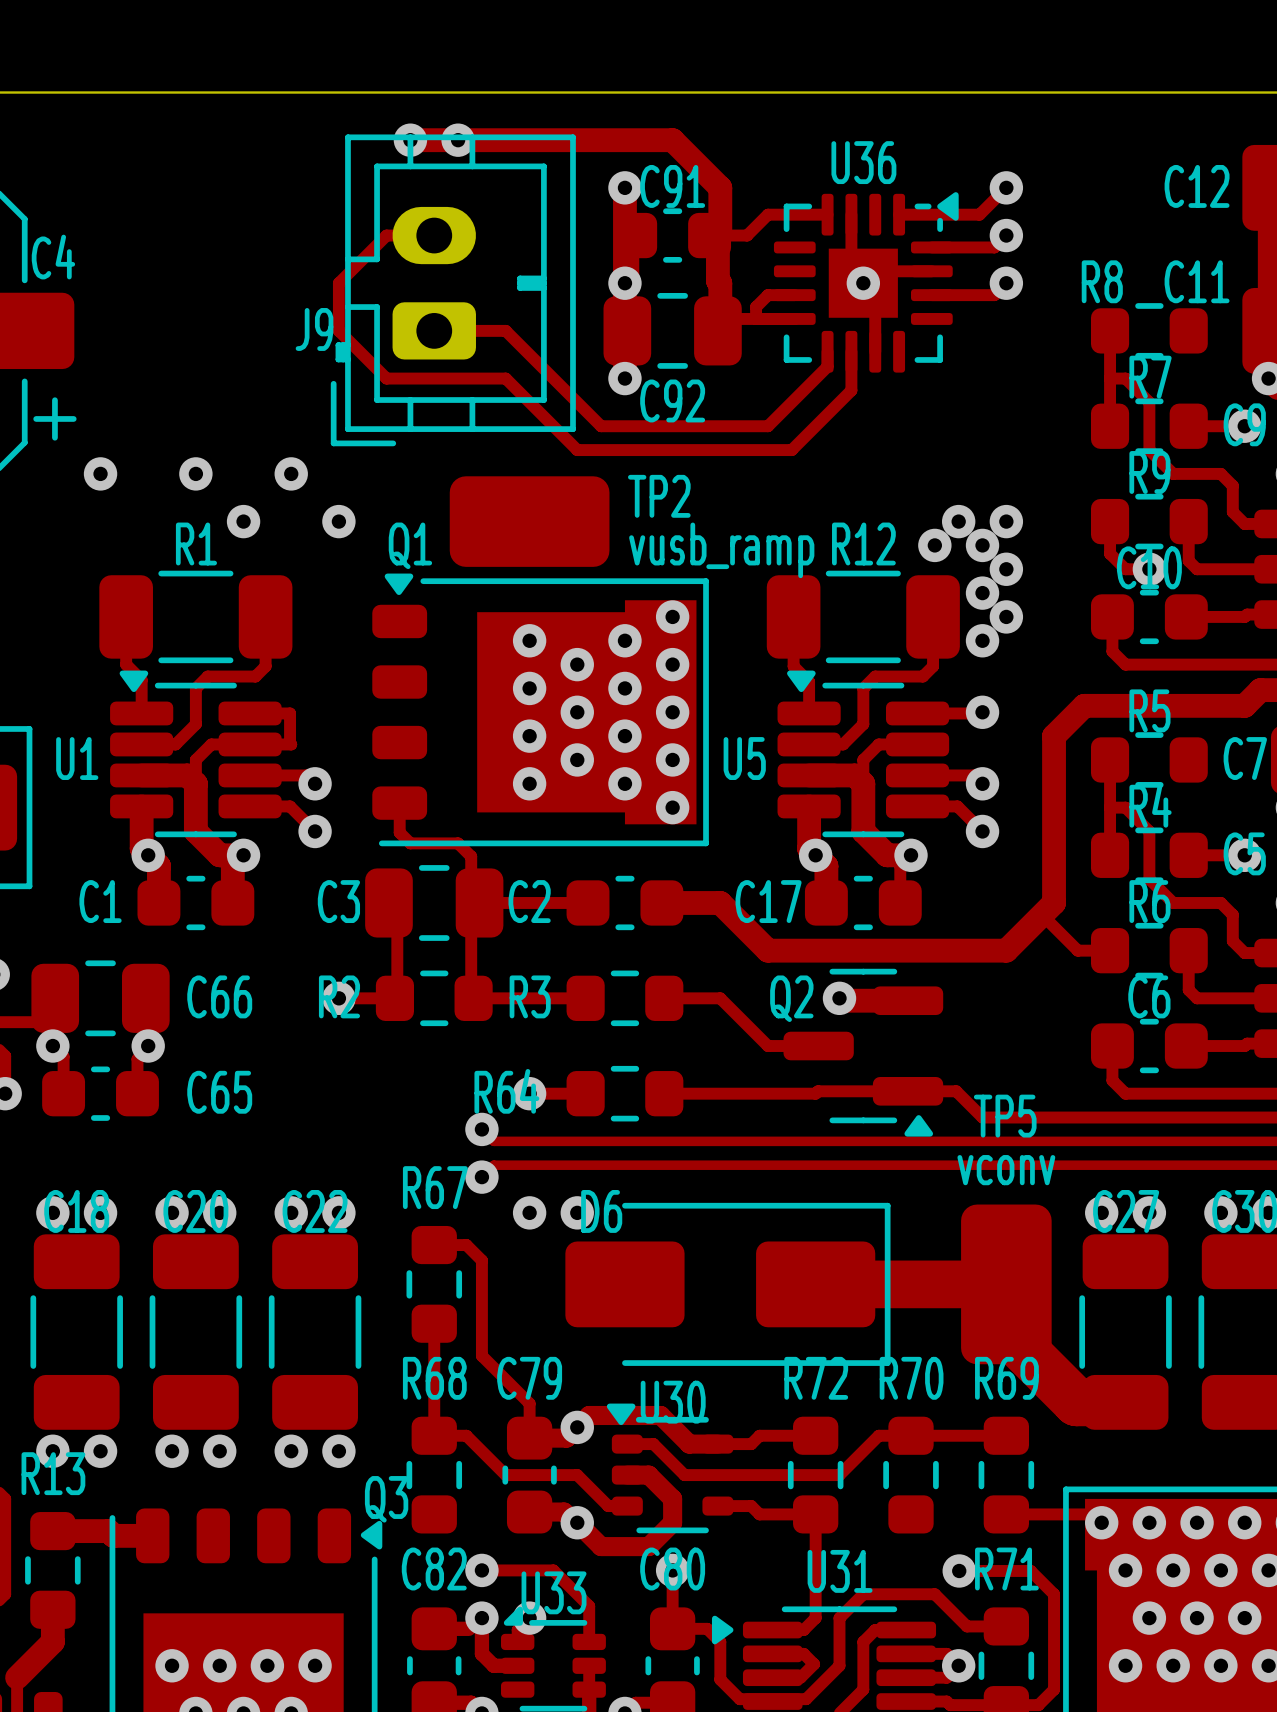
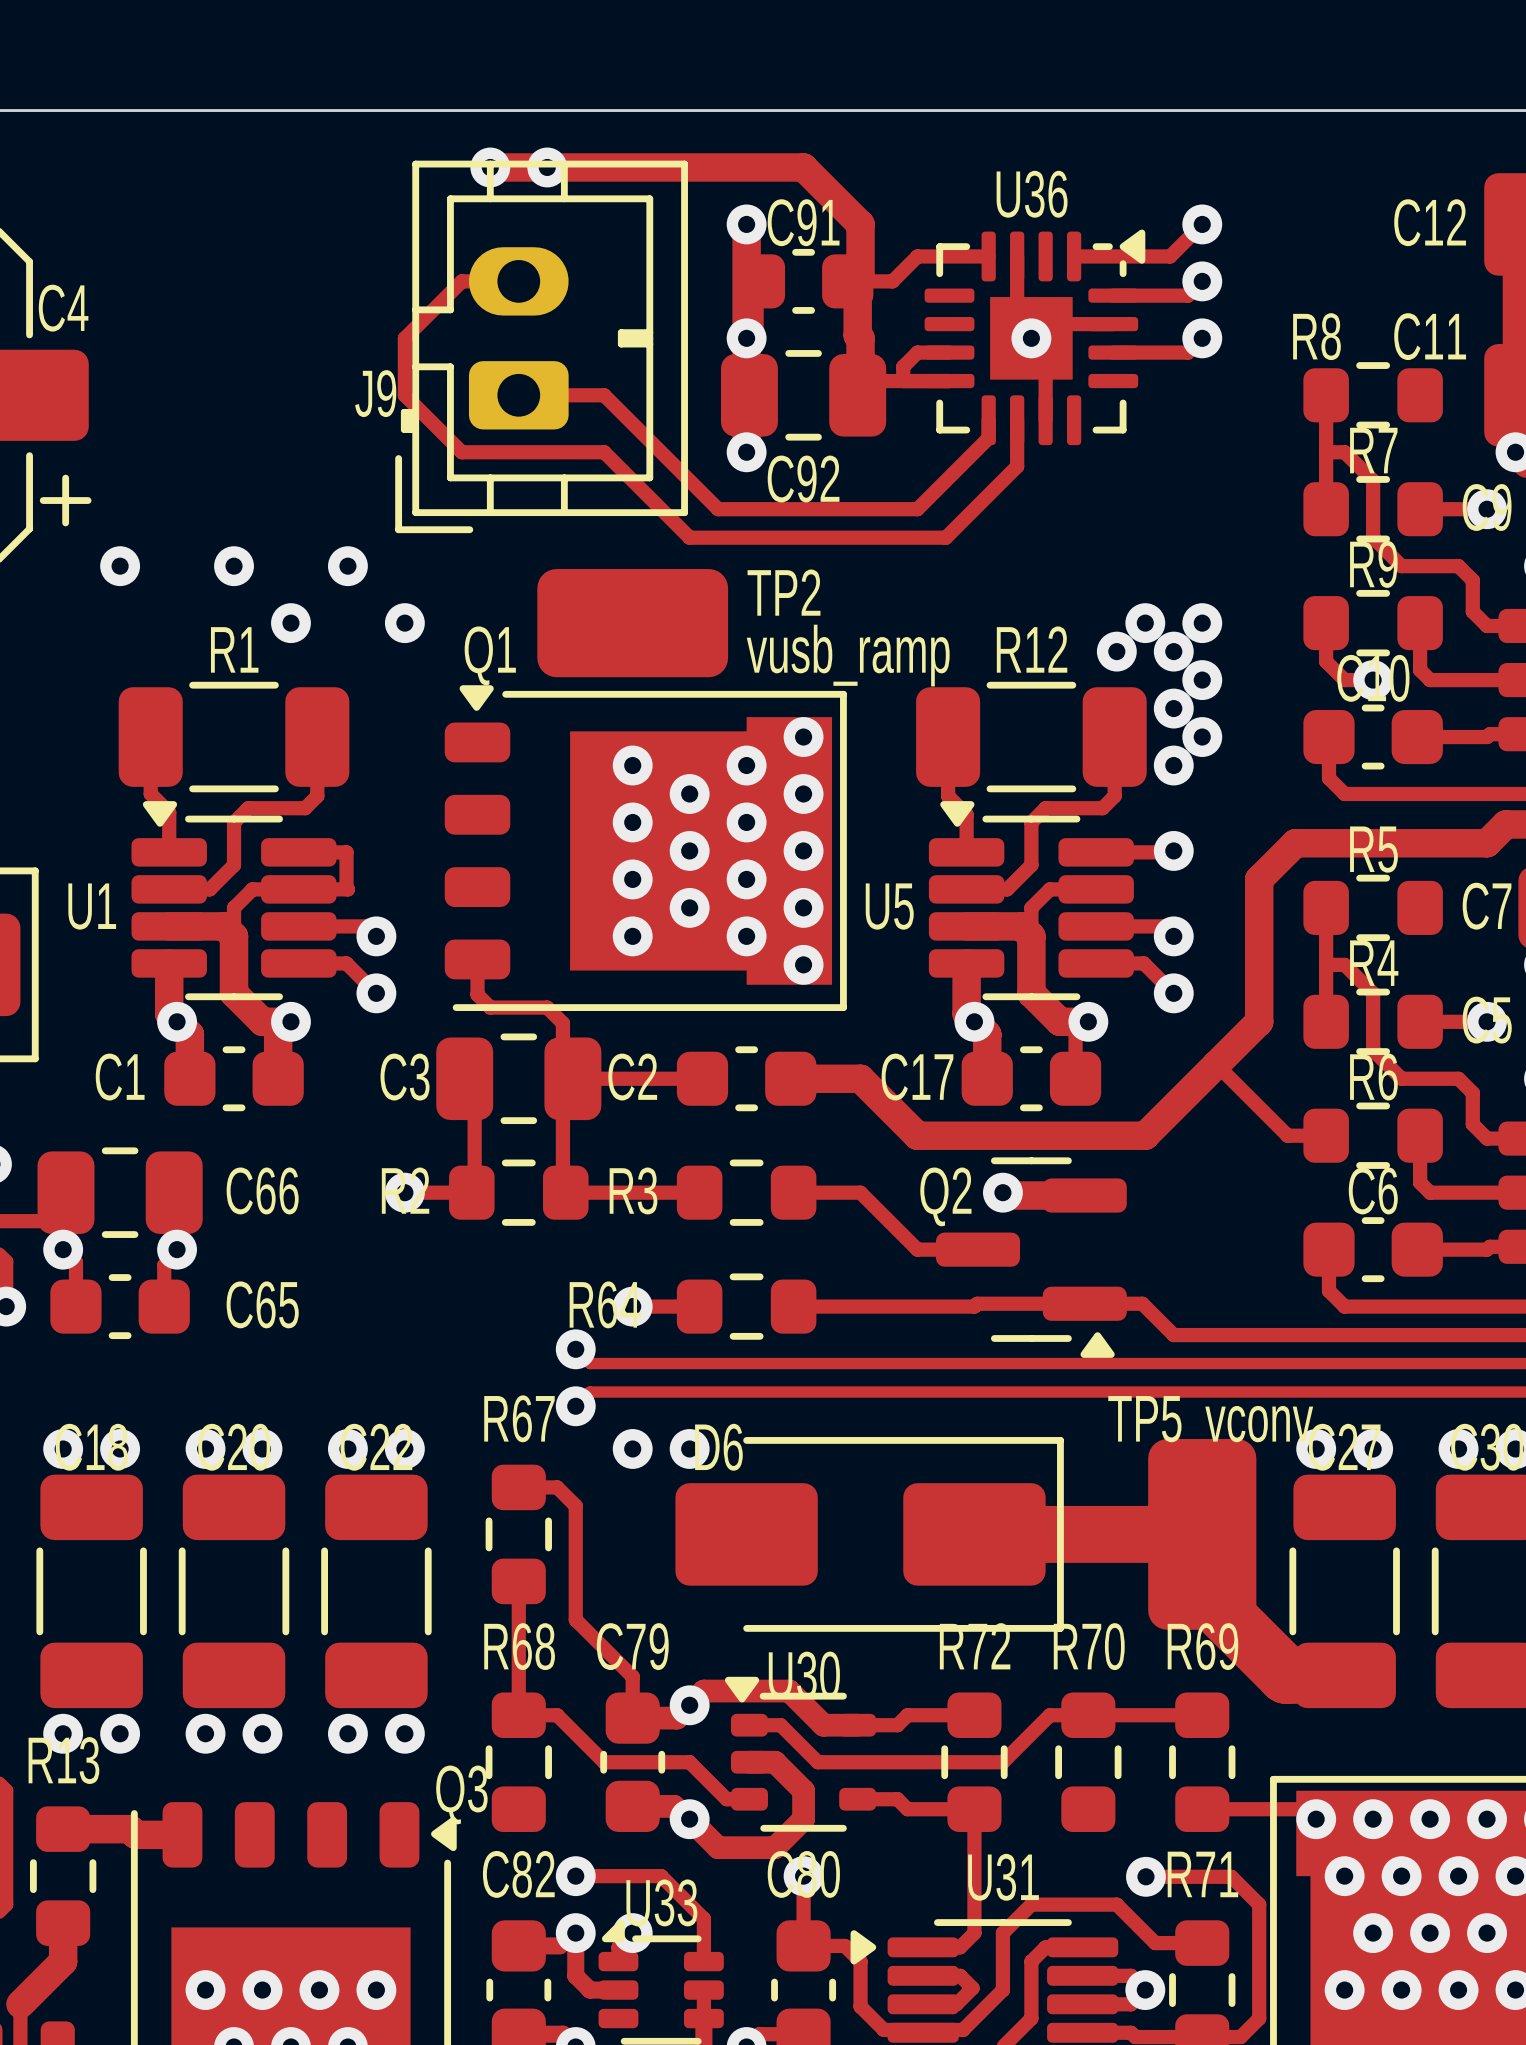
track: (1054, 855) (1054, 902) (1006, 950) (958, 950) -> (1259, 1021) (1145, 1135)
track: none -> (1216, 1064) (1244, 1093)
TP5 name position: TP5 (1005, 1116) -> TP5 (1144, 1419)
TP5 value position: vconv (1006, 1170) -> vconv (1259, 1424)

